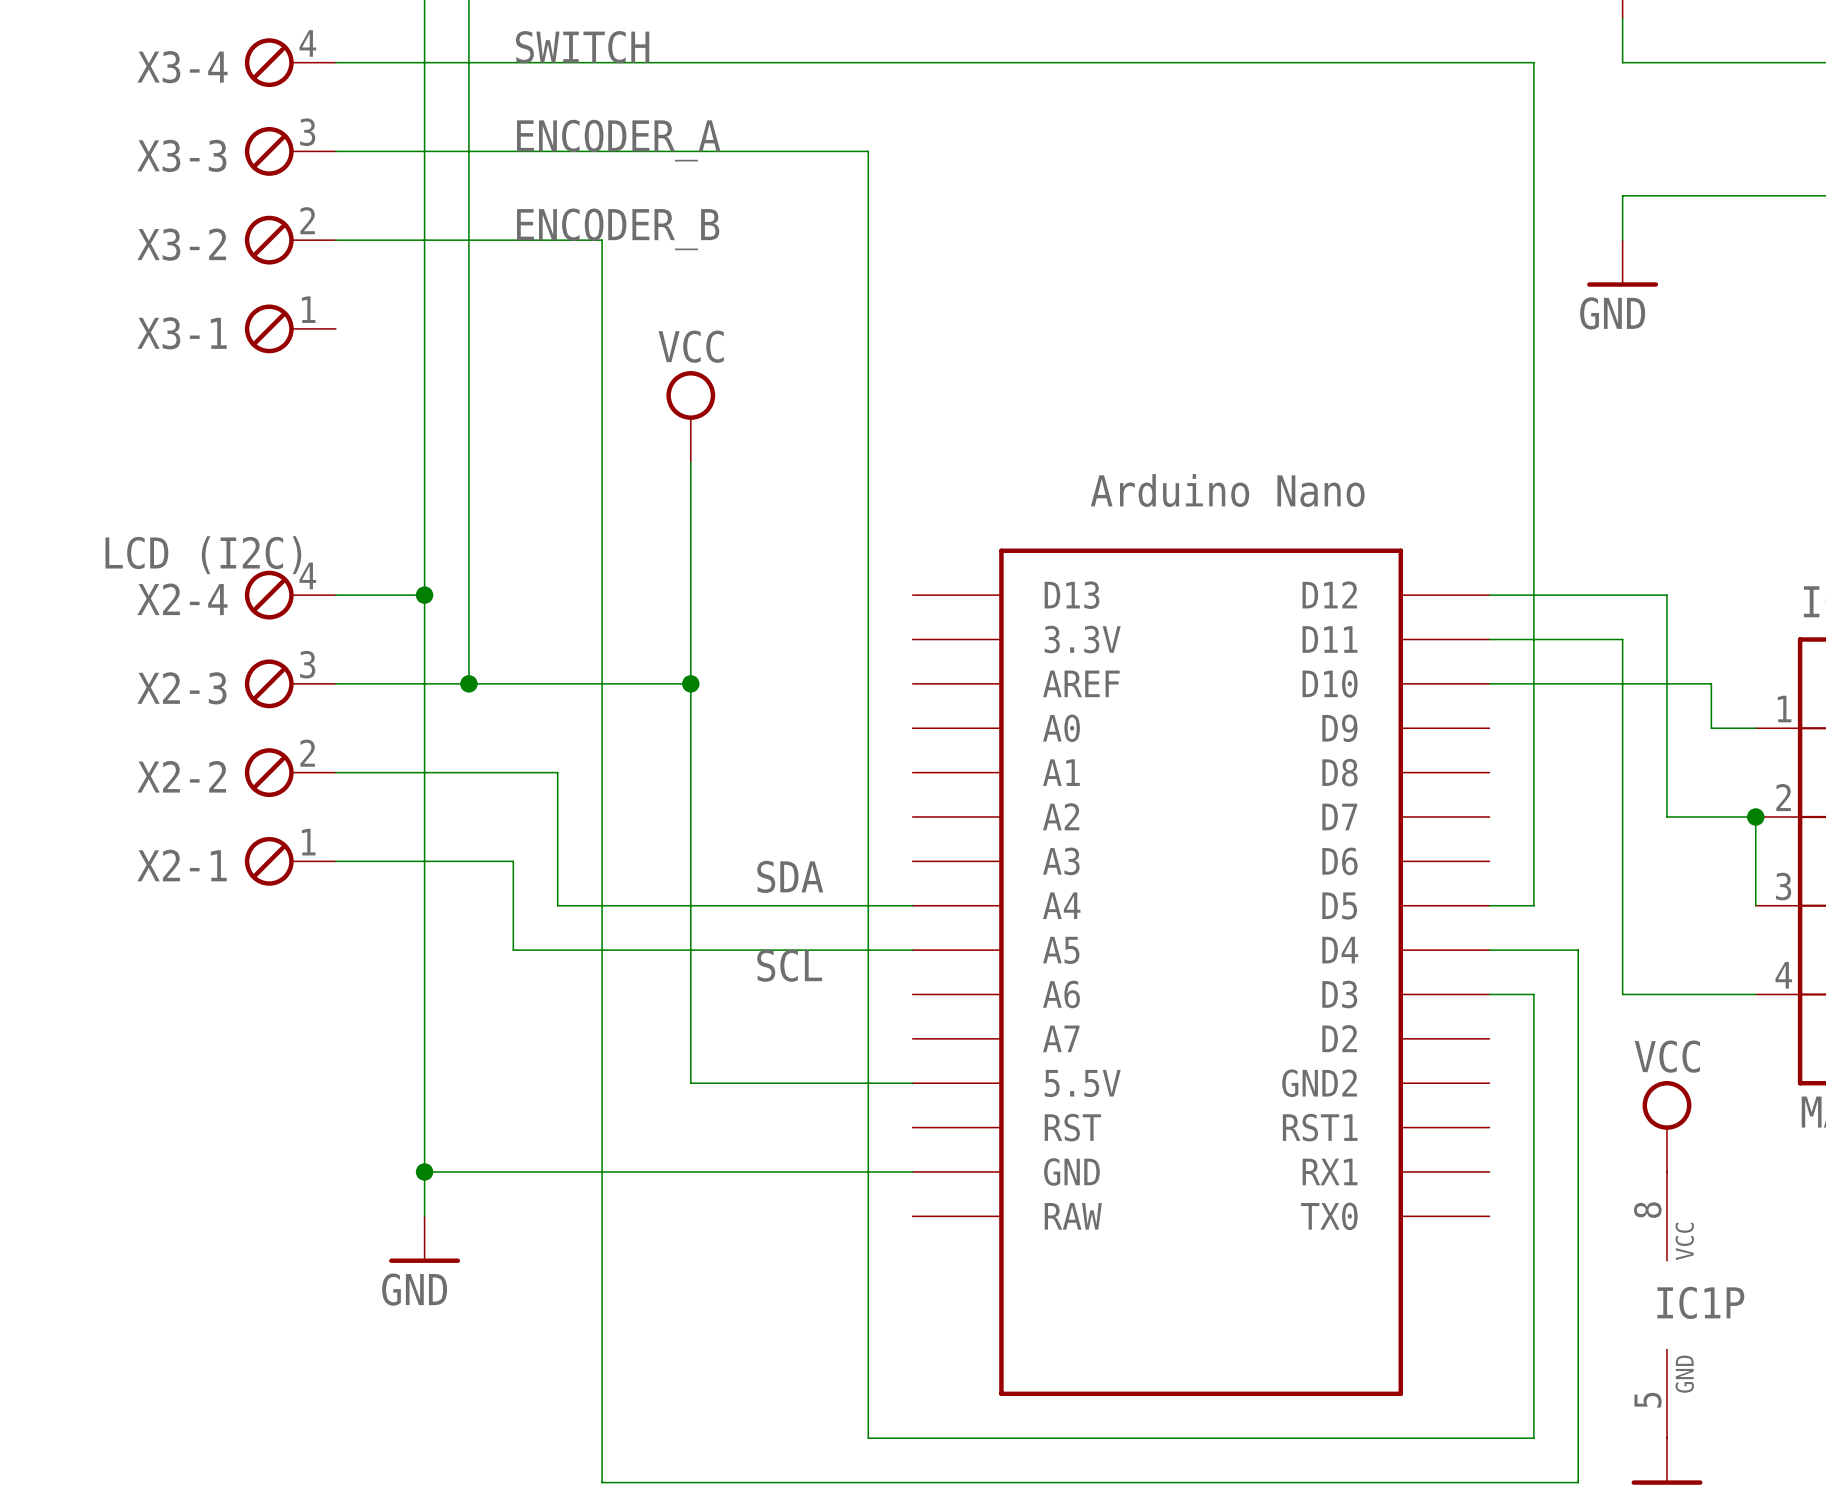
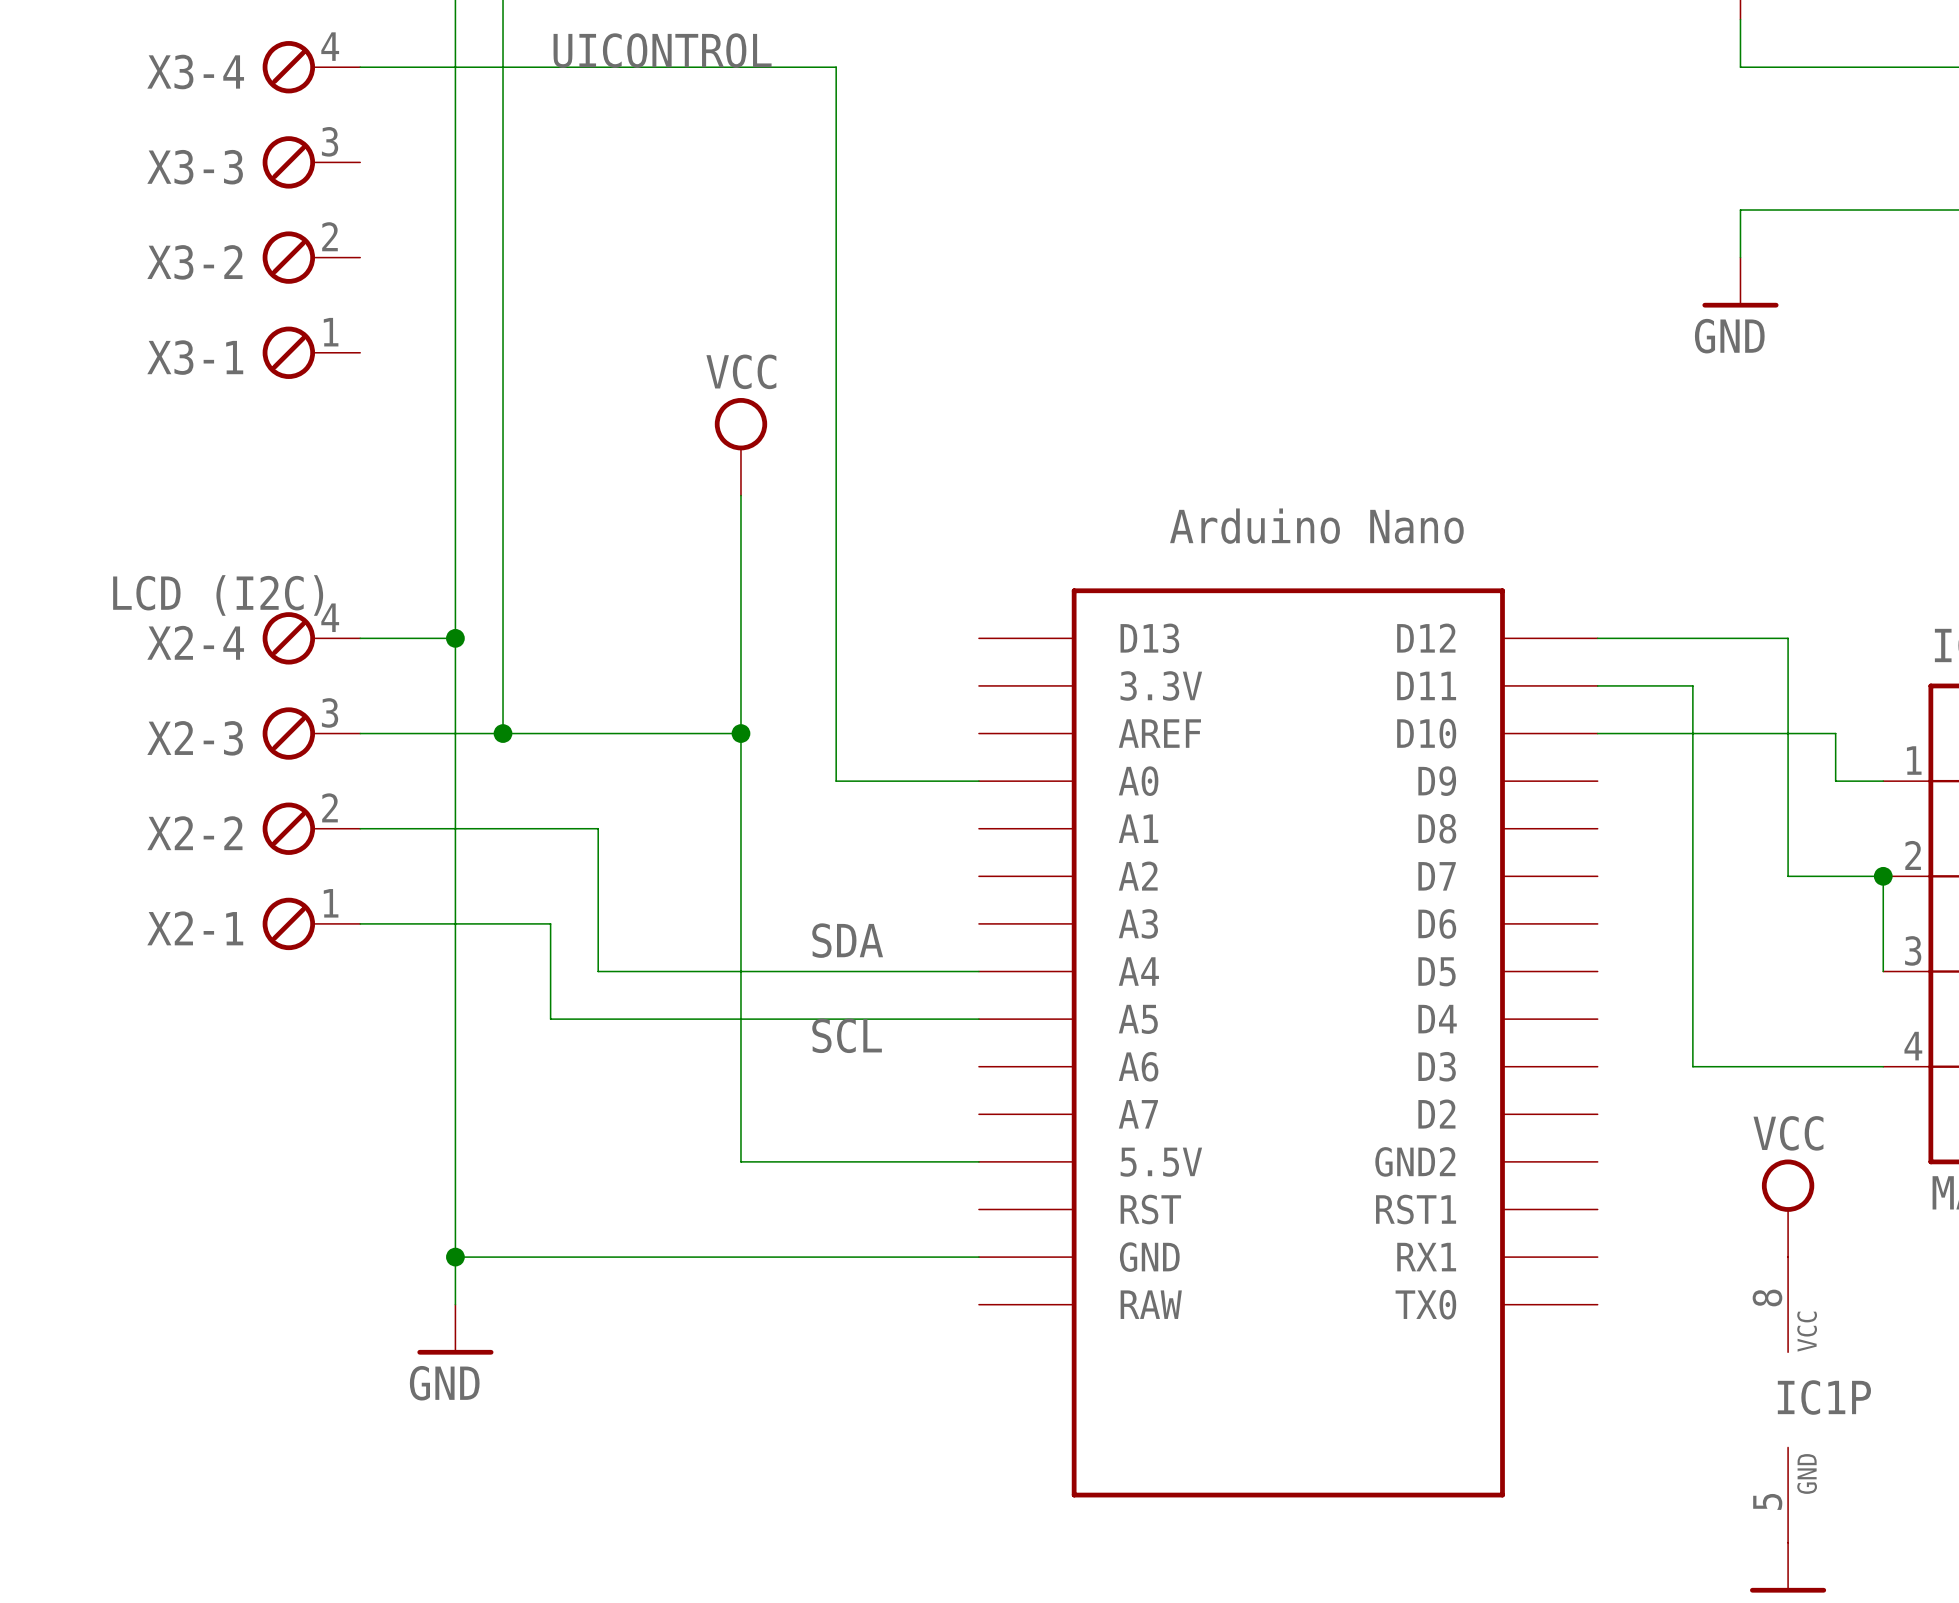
label: SWITCH (582, 47) -> UICONTROL (662, 50)
wire: (779, 62) (1533, 62) (1533, 905) (1489, 905) -> (836, 67) (836, 781) (978, 781)
label: ENCODER_A (618, 140) -> none
wire: (335, 151) (868, 151) (868, 1438) (1533, 1438) (1533, 994) (1489, 994) -> none
label: ENCODER_B (618, 229) -> none
wire: (335, 240) (602, 240) (602, 1482) (1578, 1482) (1578, 994) -> (1740, 1066) (1692, 1066)
wire: (1578, 639) (1622, 639) (1622, 994) -> (1692, 685) (1692, 1019)
wire: (1489, 950) (1578, 950) -> none

